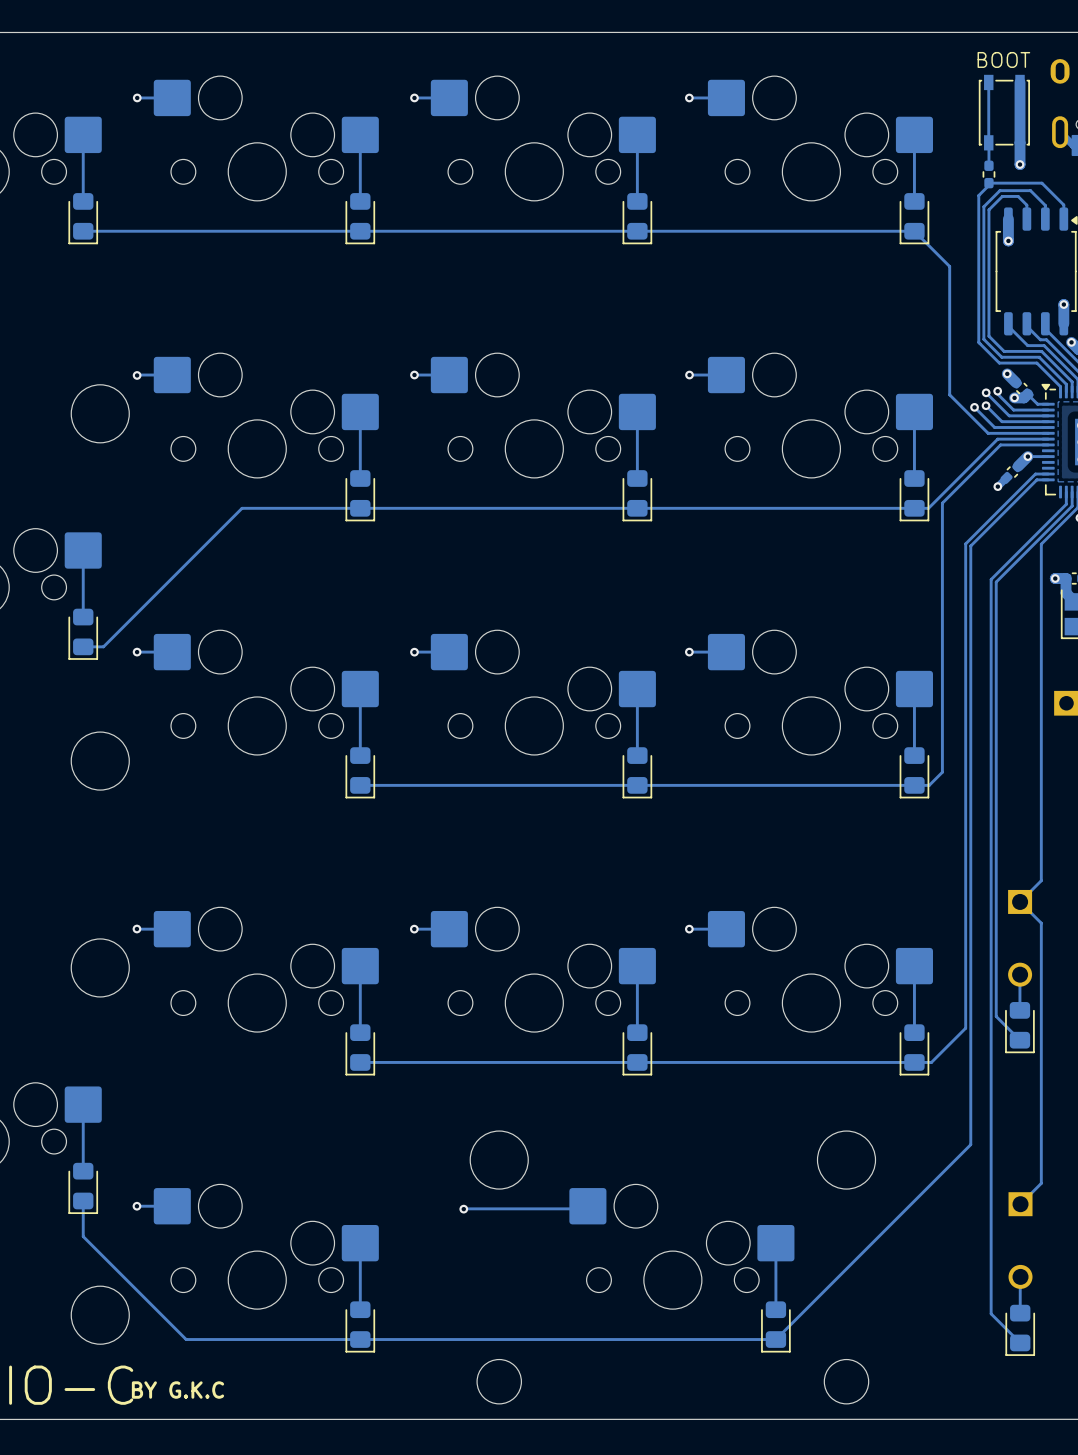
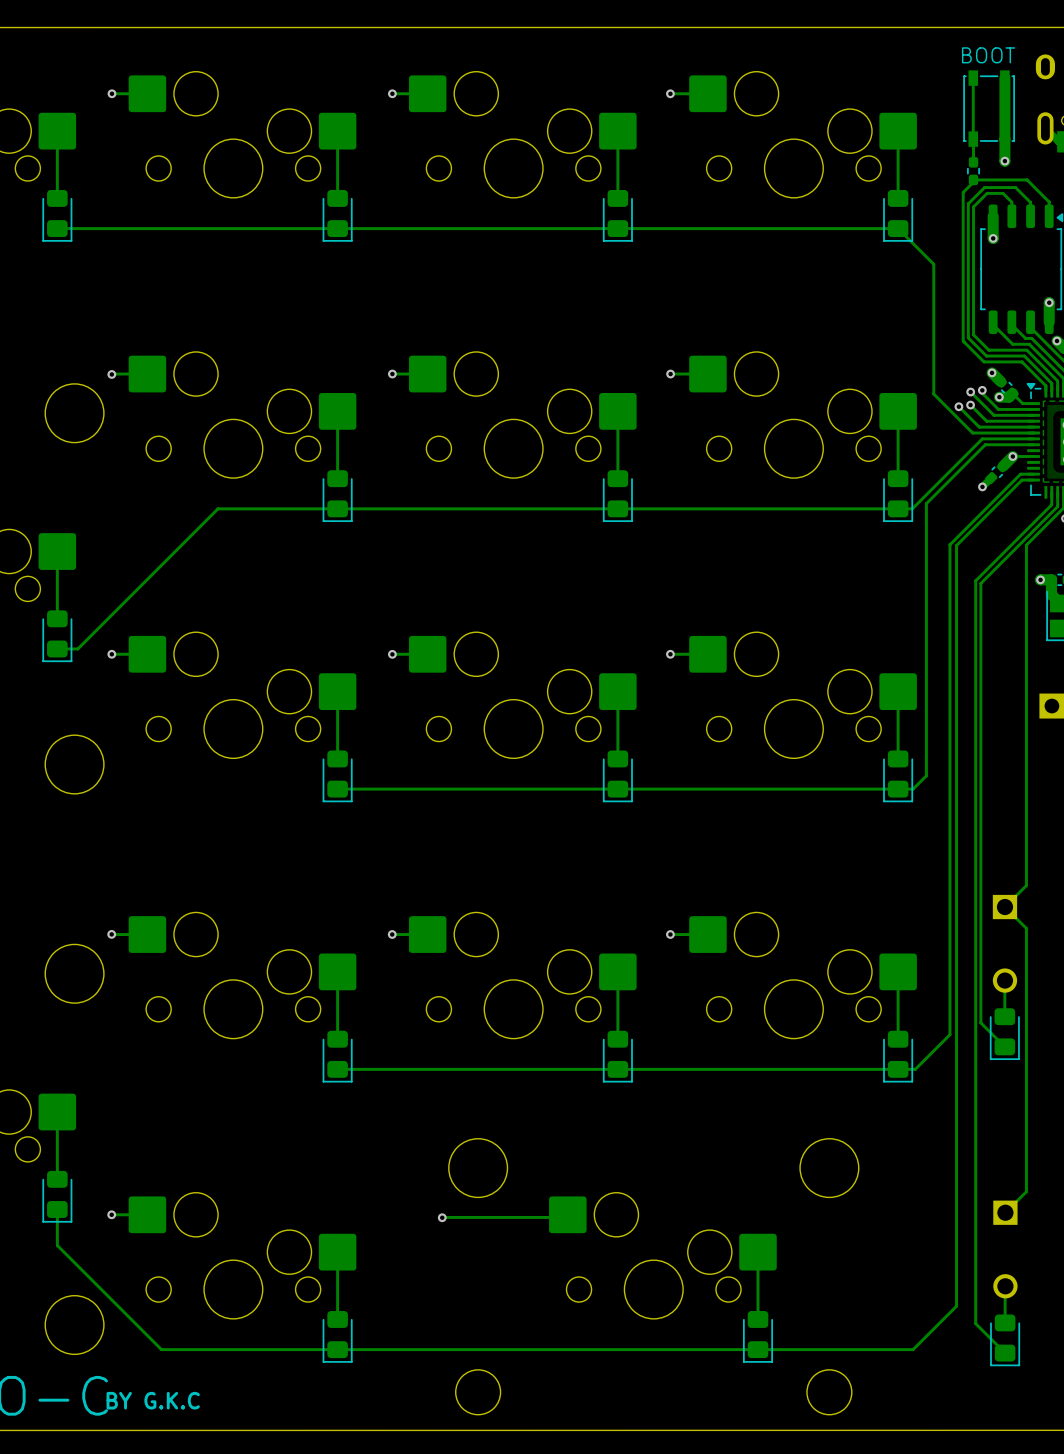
track: (972, 544) (970, 1144) (775, 1339) -> (956, 545) (956, 1306) (913, 1349) (758, 1349)

